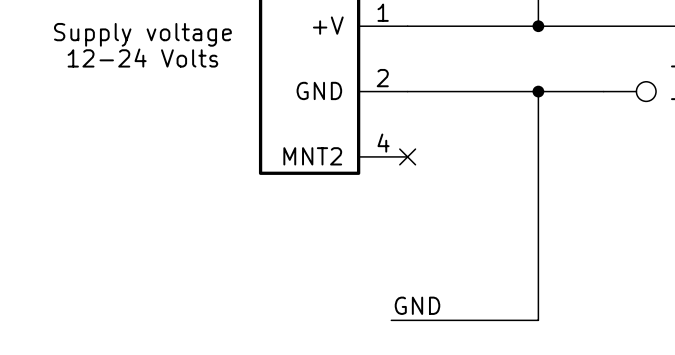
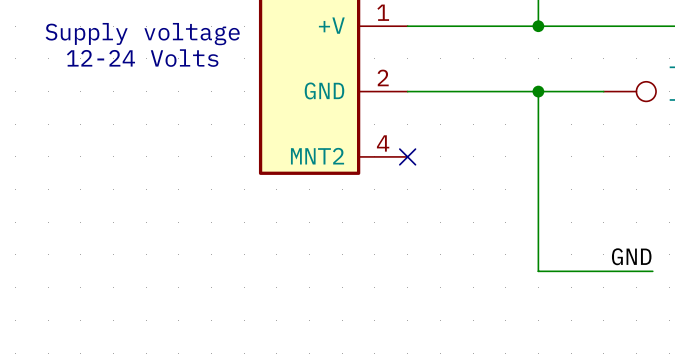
wire: (538, 271) (538, 320) (391, 320) -> (538, 271) (652, 271)
label position: GND (417, 305) -> GND (631, 256)

